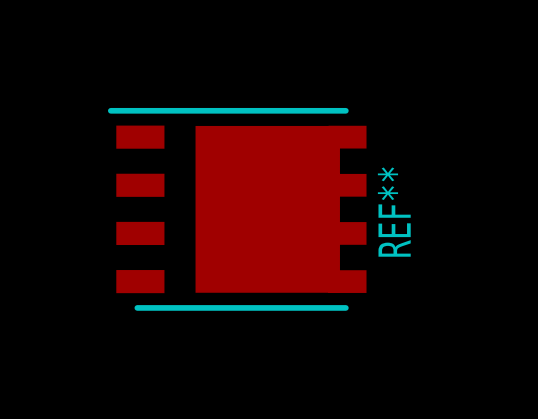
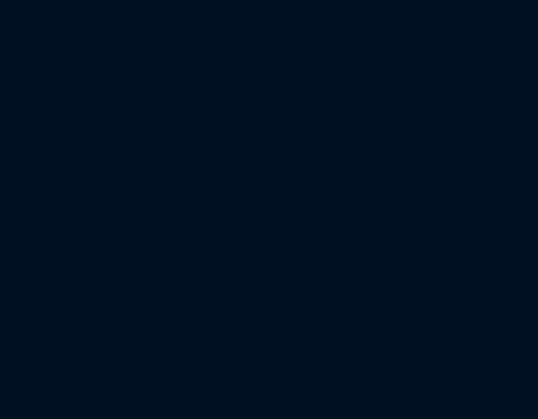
REF**: (237, 209) -> none

